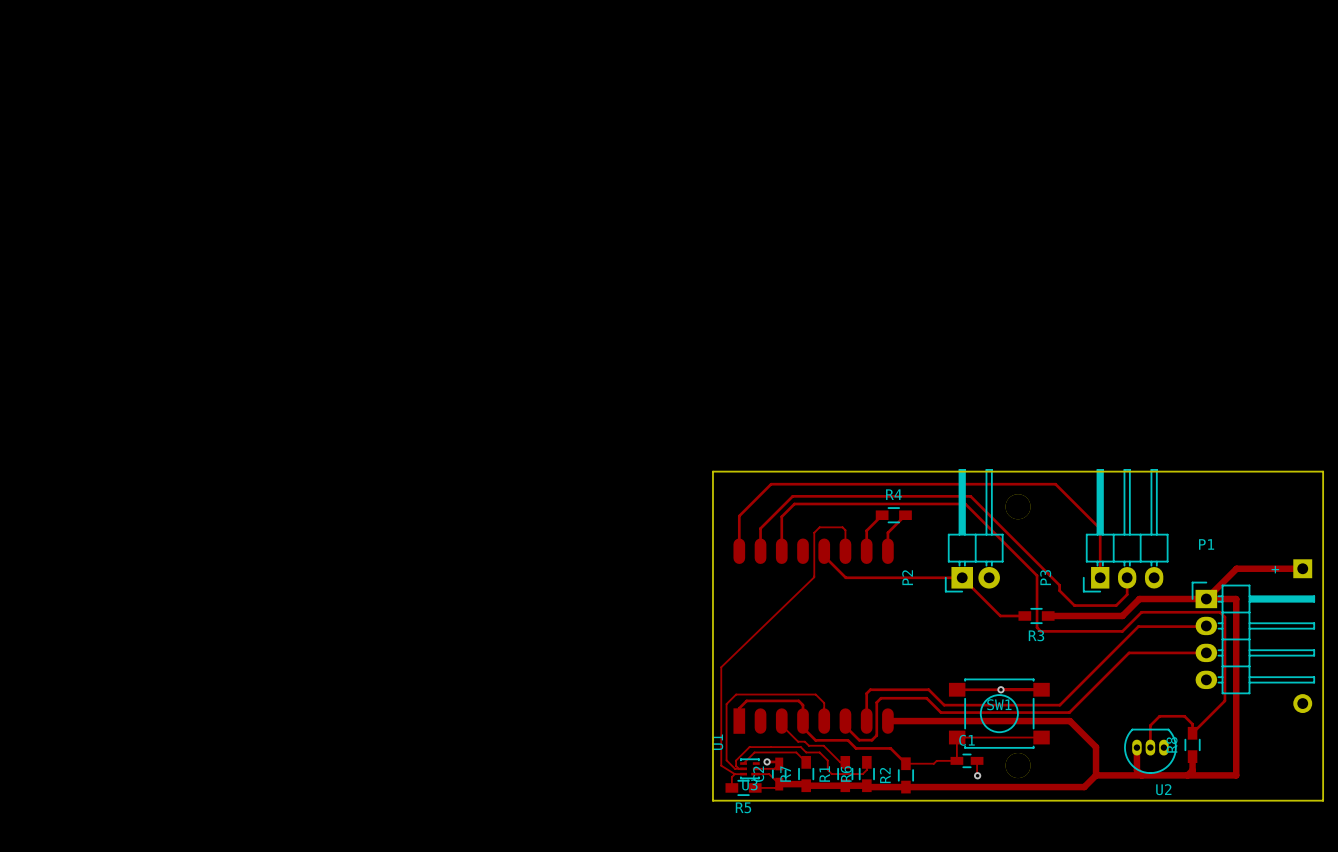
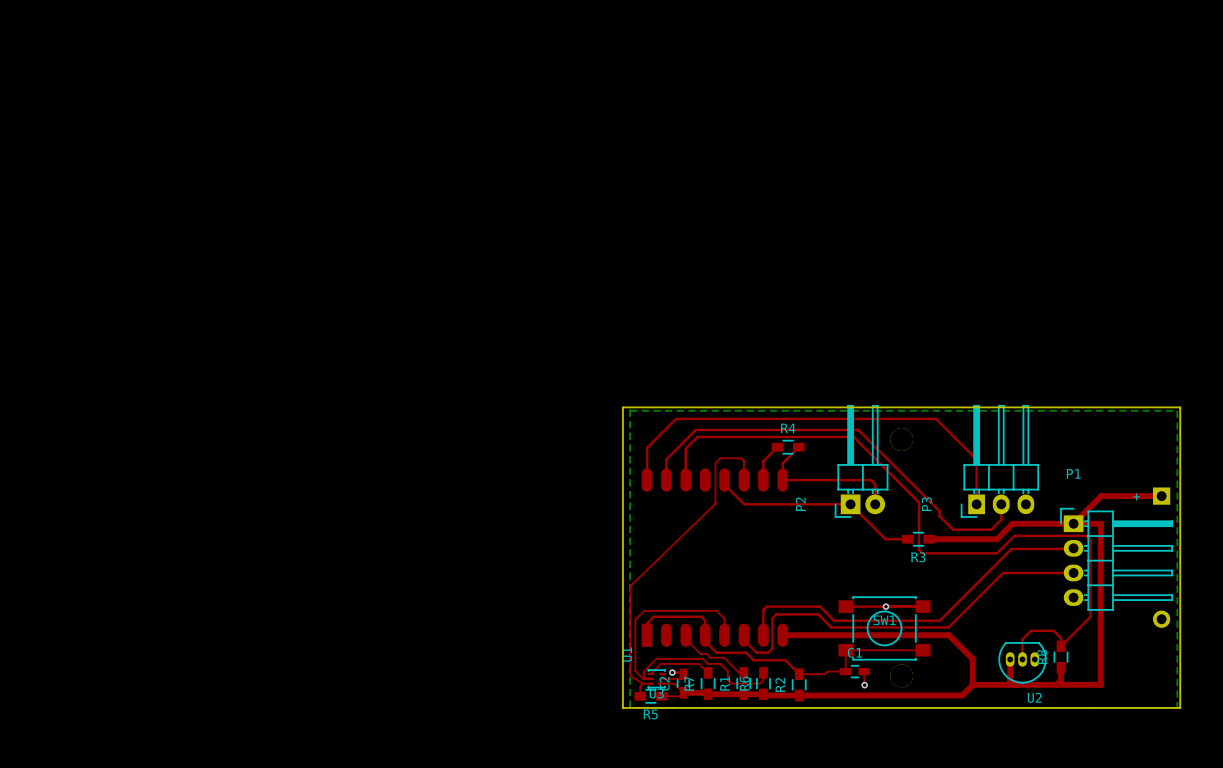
bottom zone outline: none -> (630, 409) (630, 707) (1177, 707) (1177, 410) (630, 409)
top track: none -> (782, 480) (870, 480) (875, 484) (875, 504)

